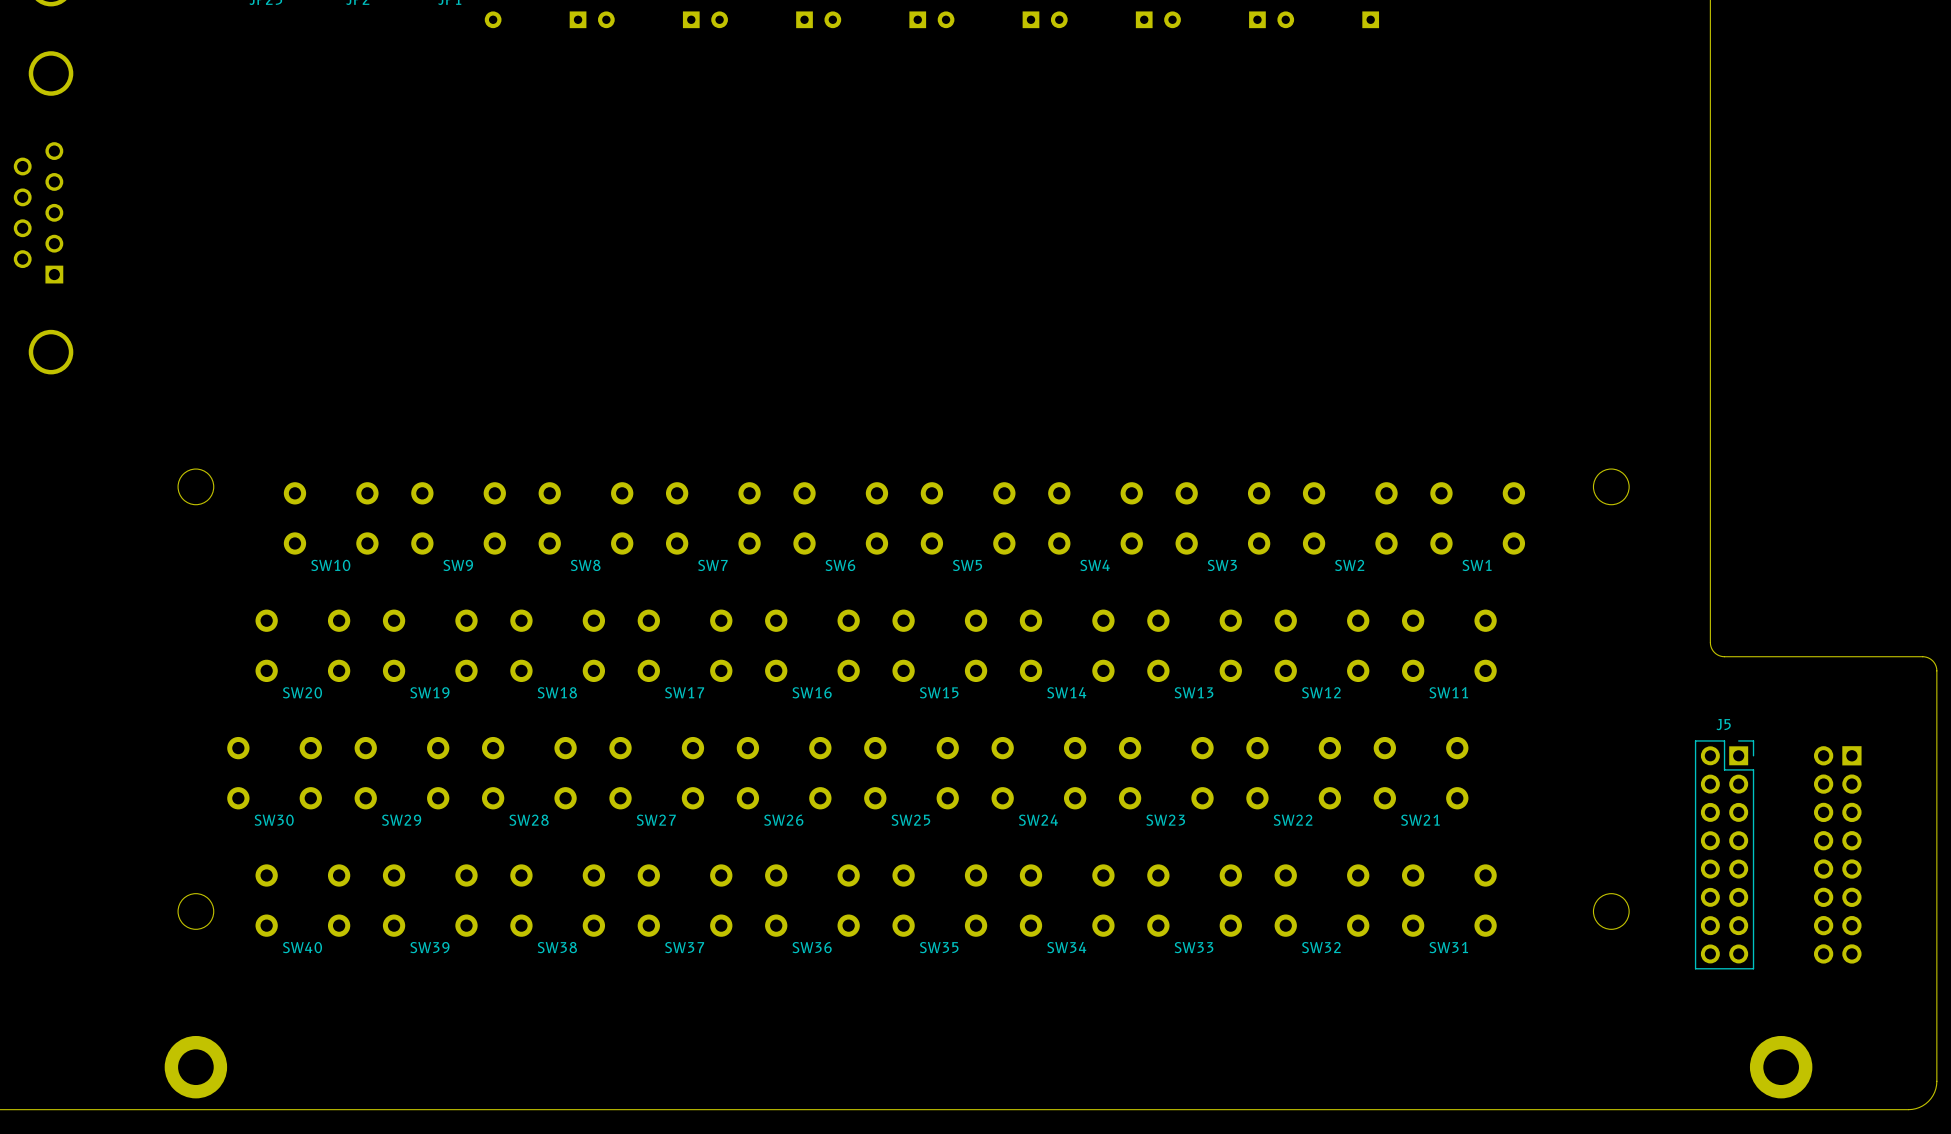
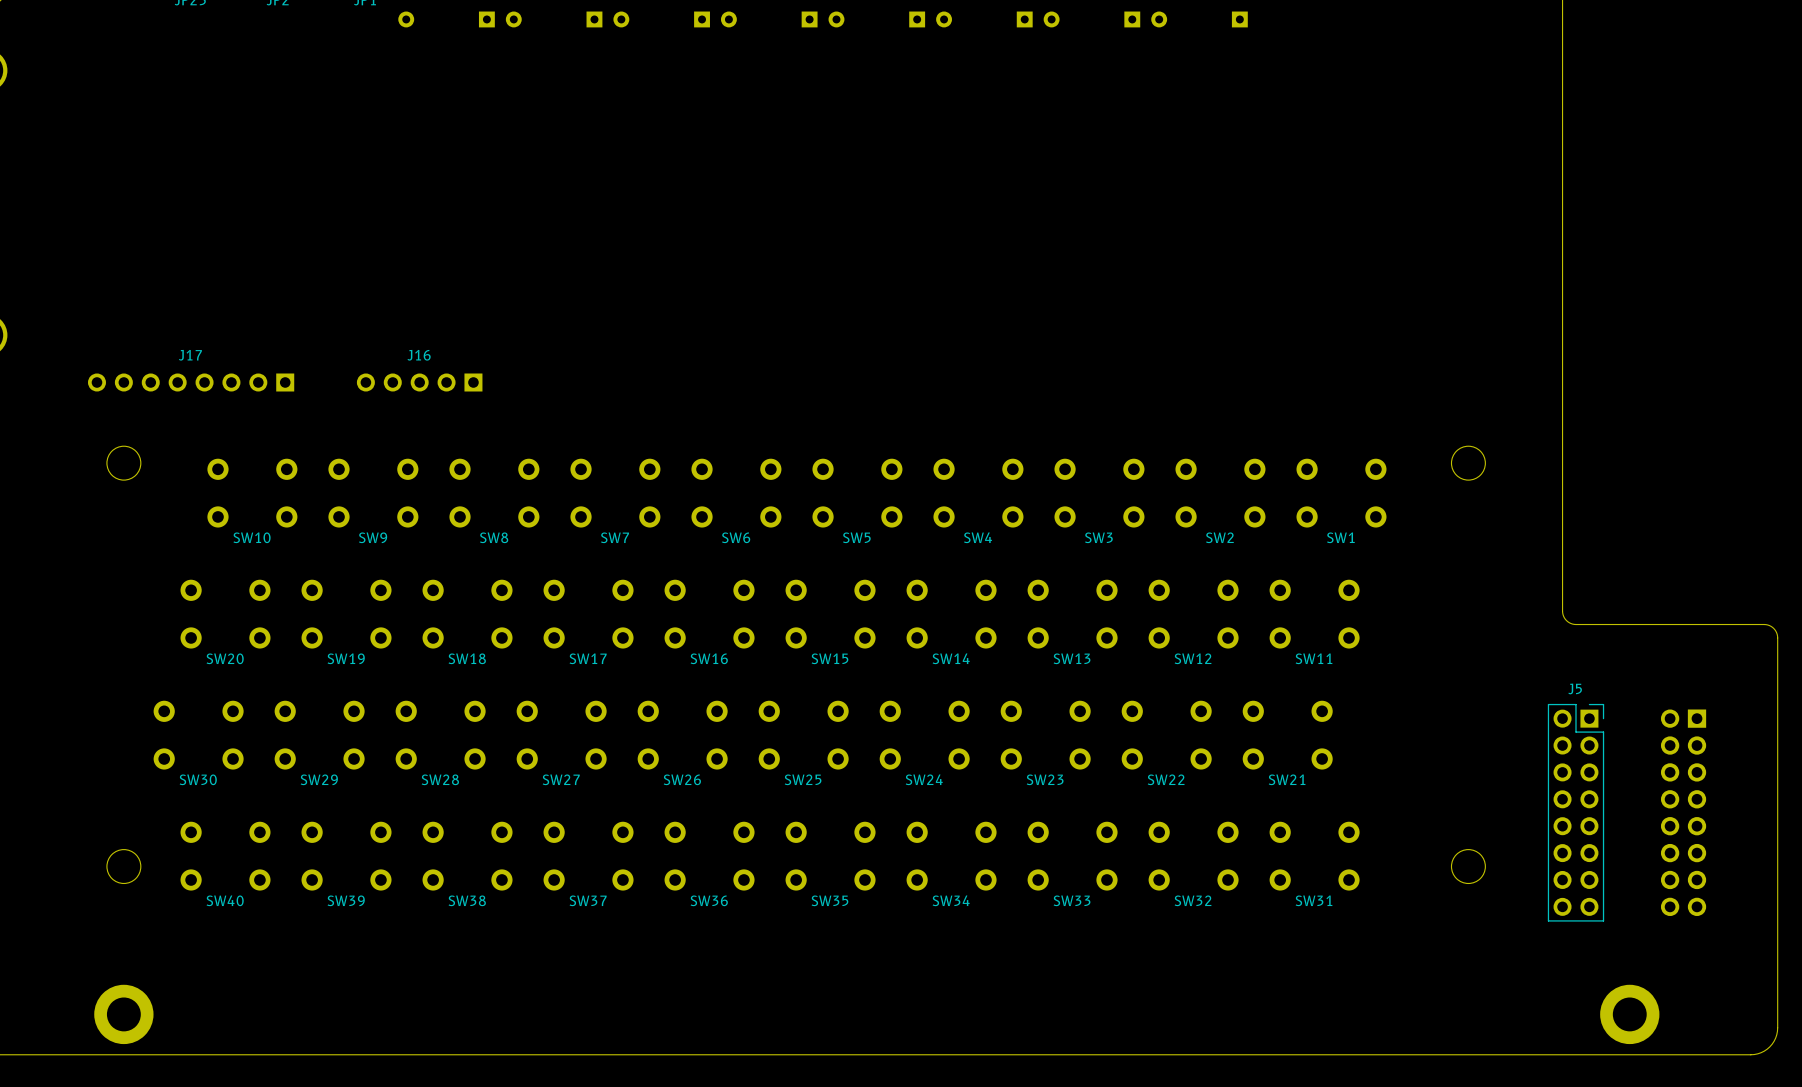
J17: none -> (191, 382)
J16: none -> (419, 382)

